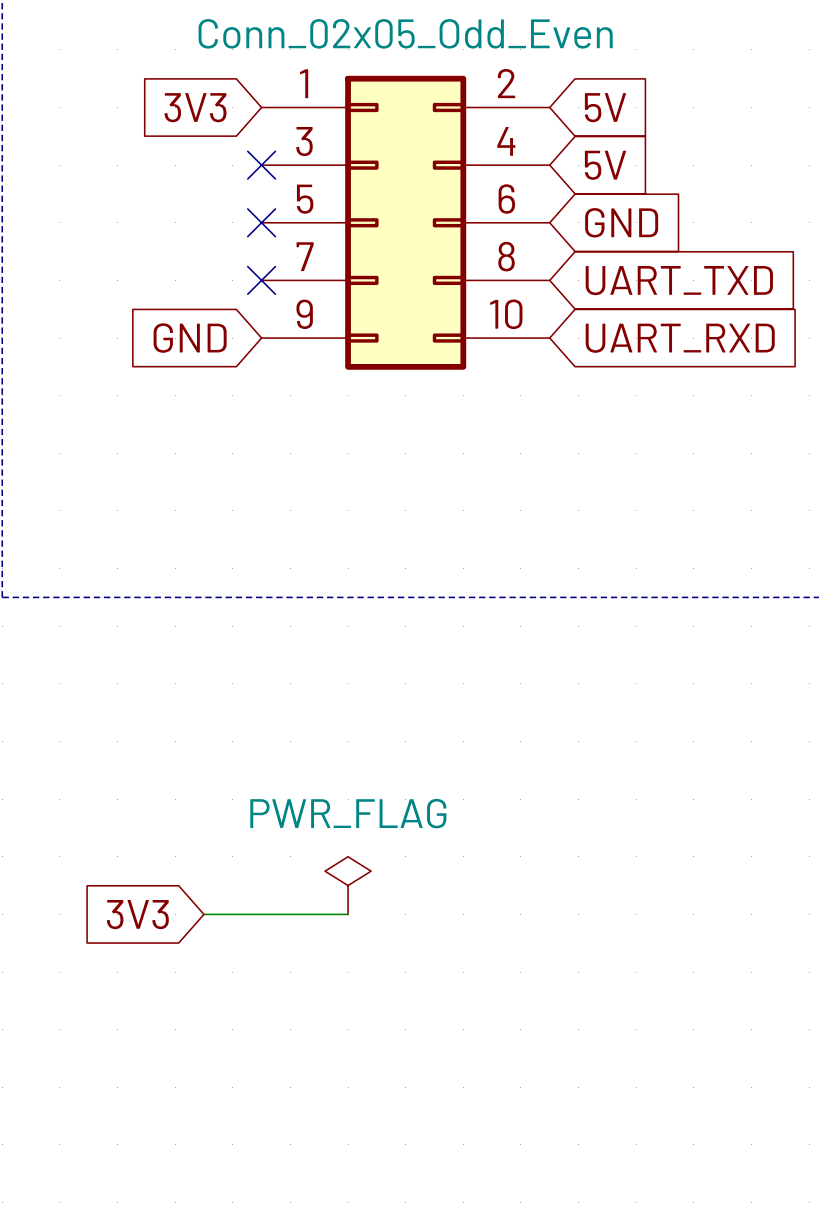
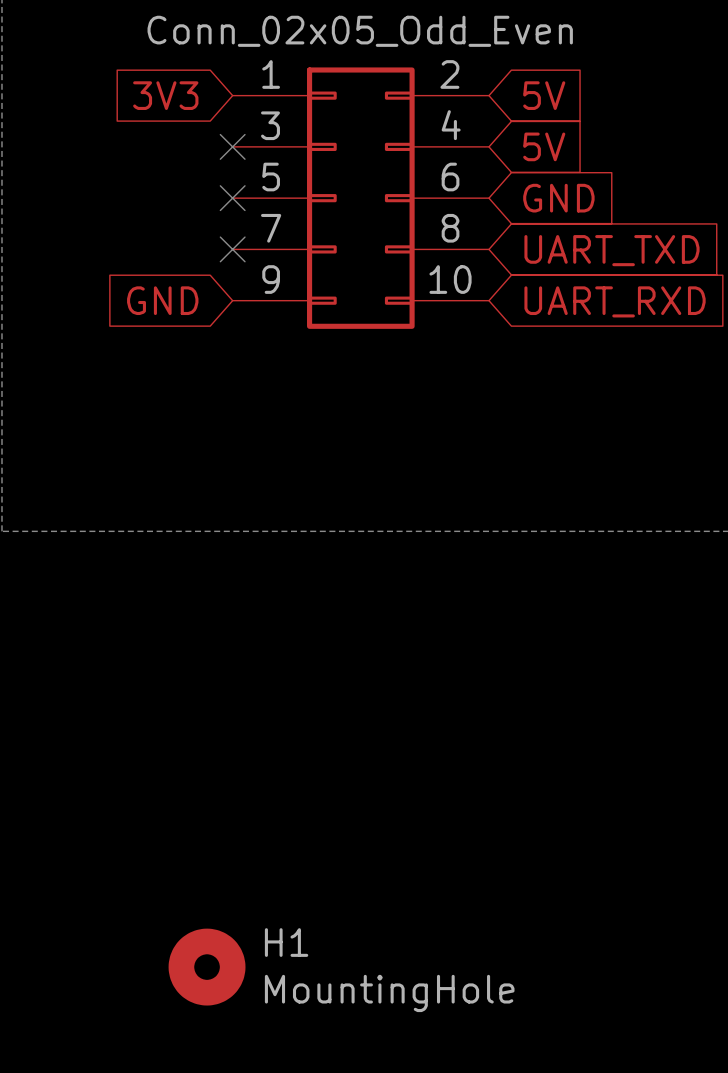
power symbol: PWR_FLAG (348, 885) -> none
global label: 3V3 (137, 914) -> none
wire: (203, 914) (348, 914) -> none
H1: none -> MountingHole (207, 967)

